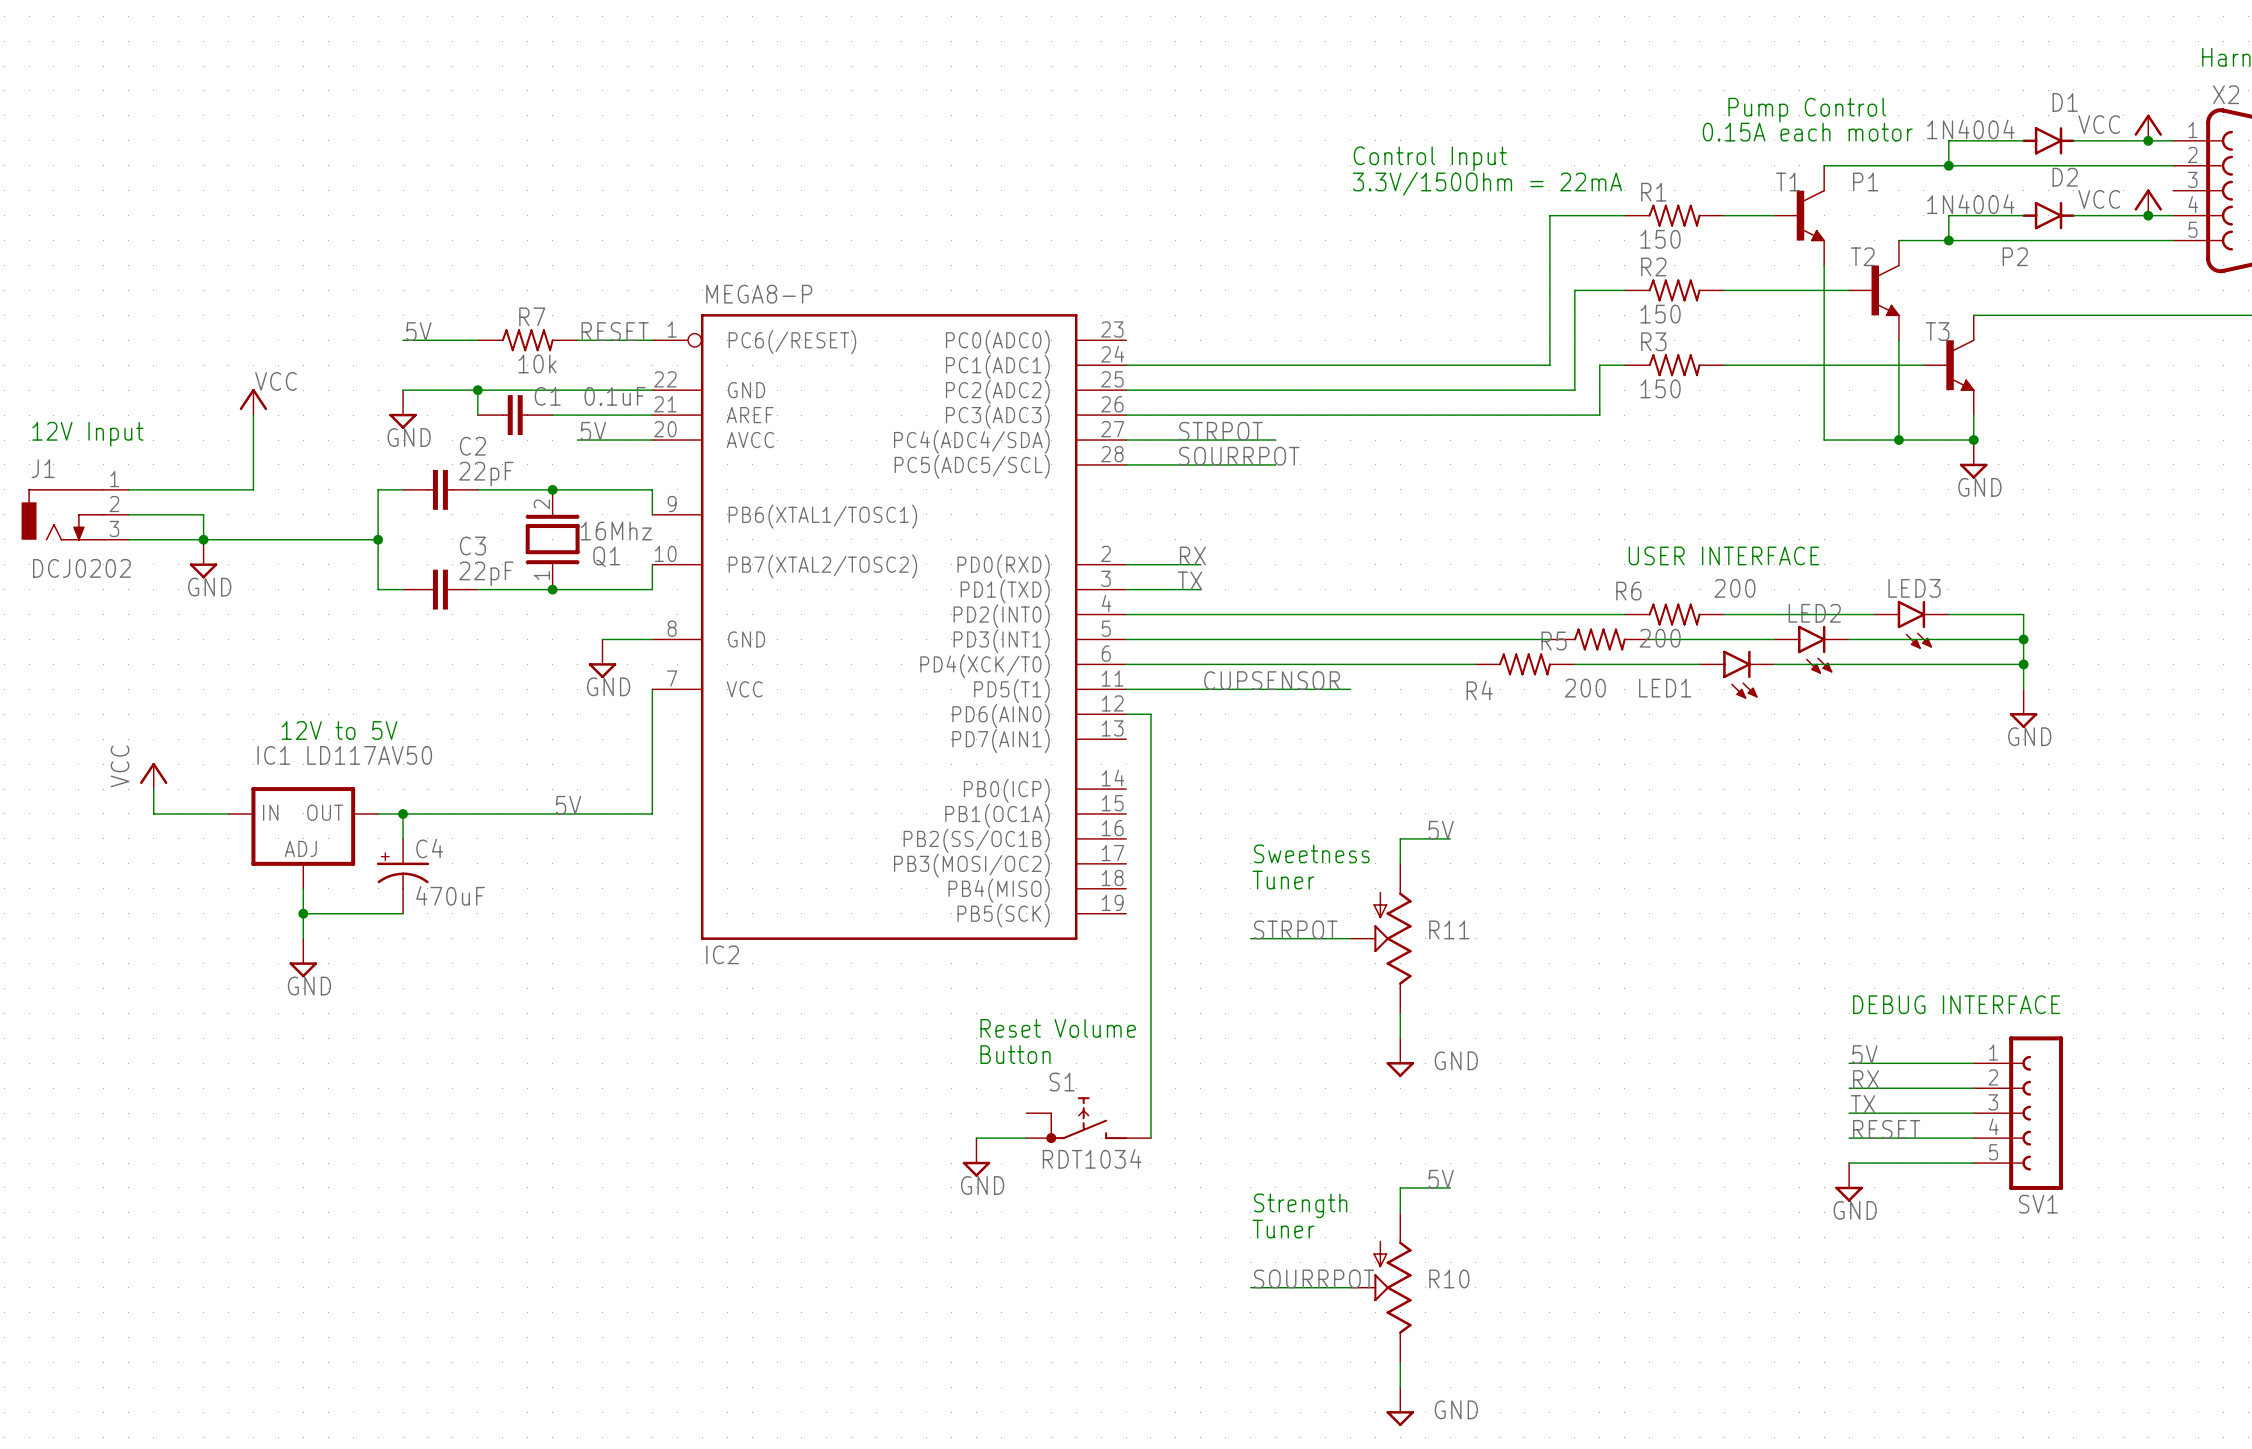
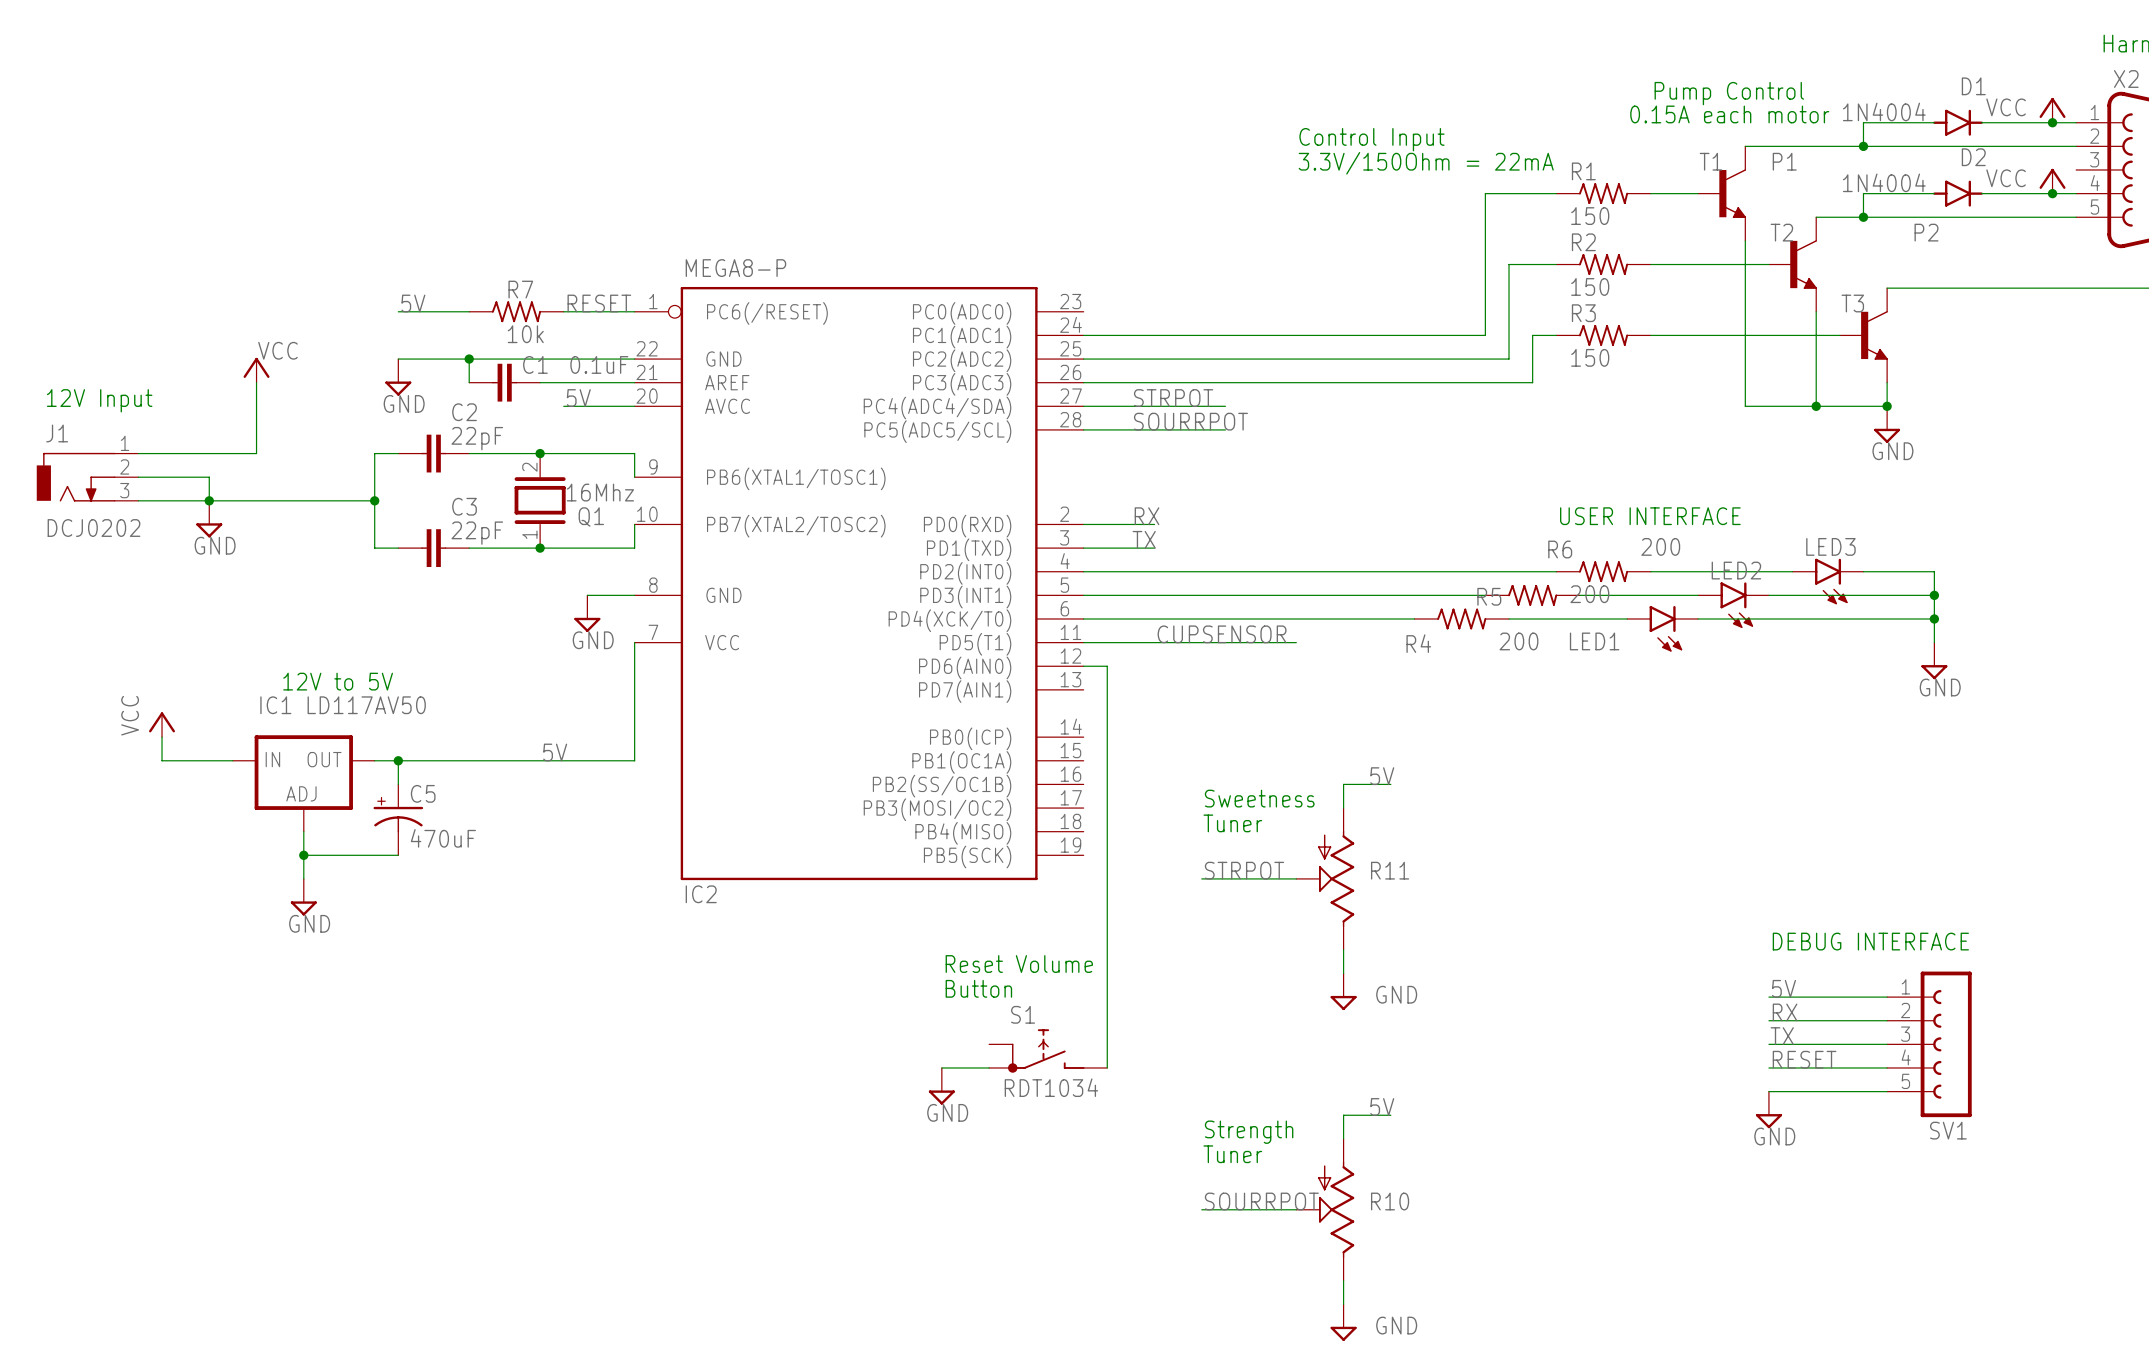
C4 name: C4 (429, 848) -> C5 (423, 793)

